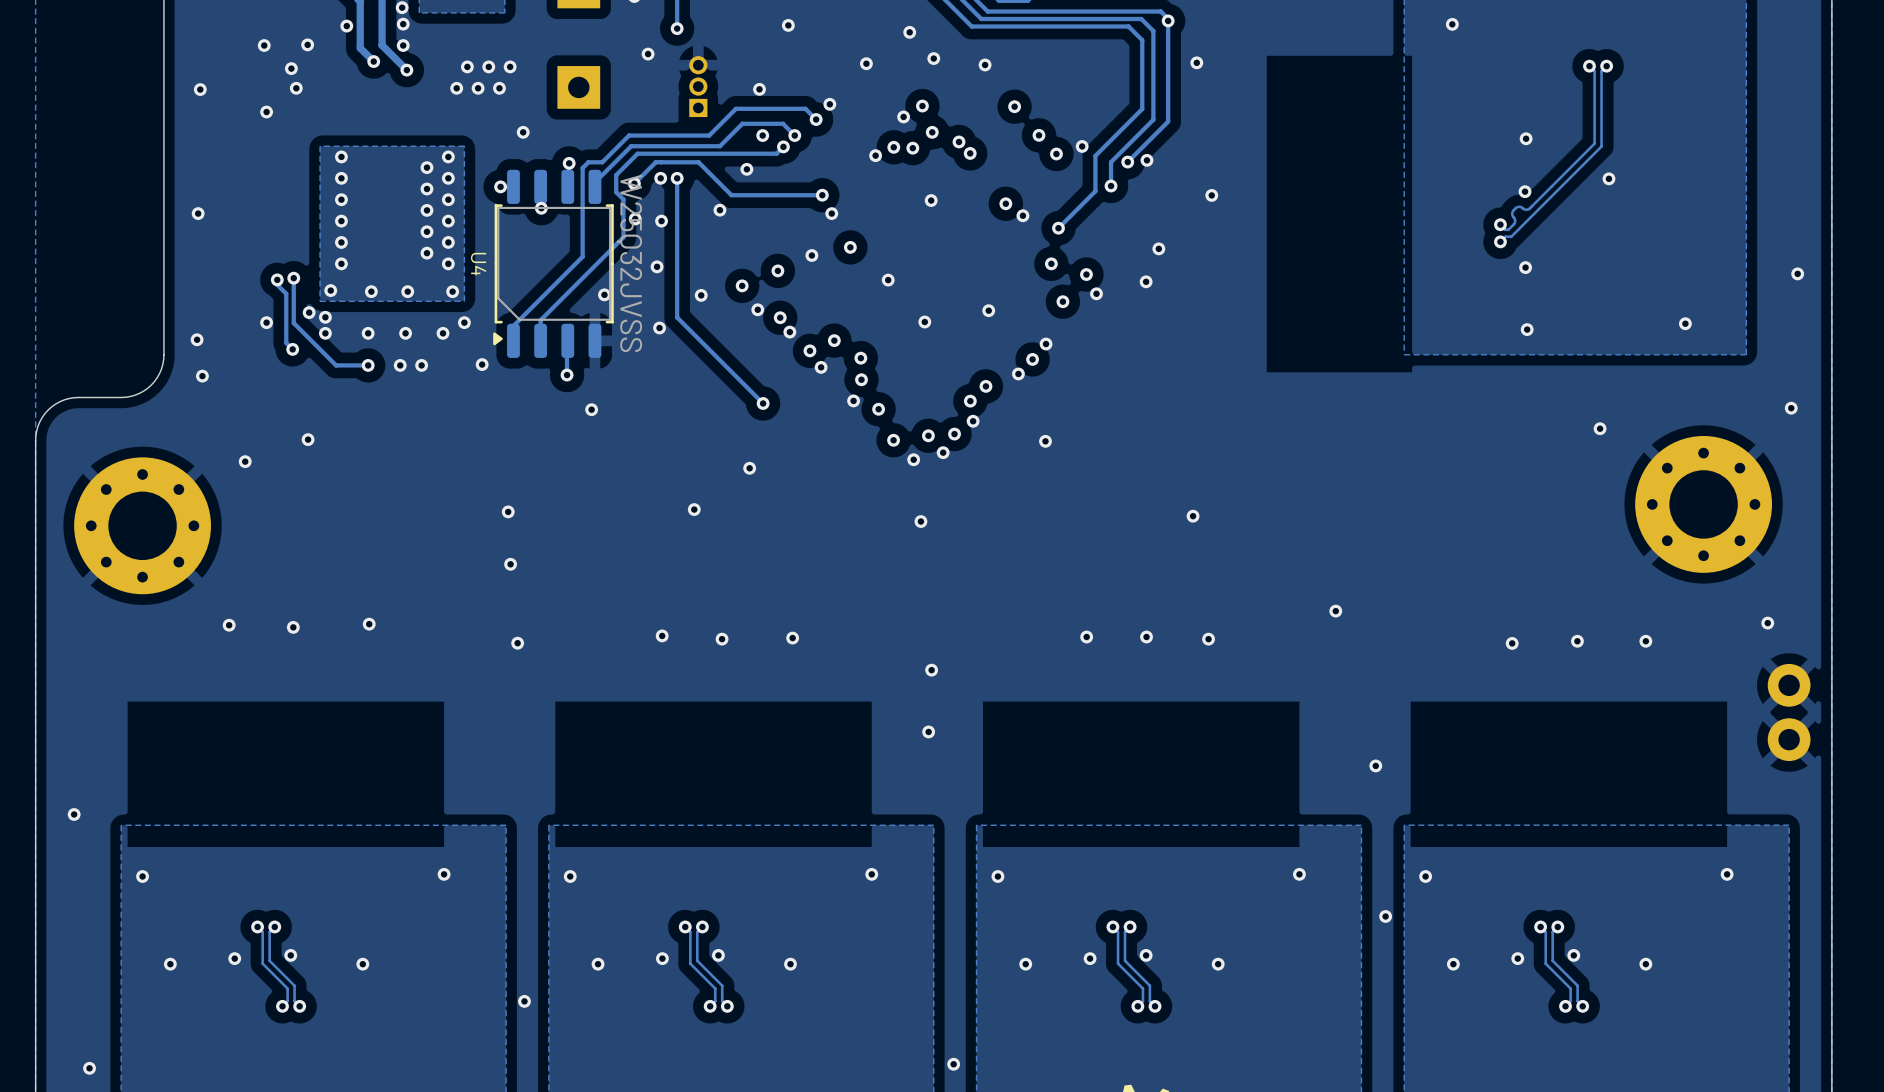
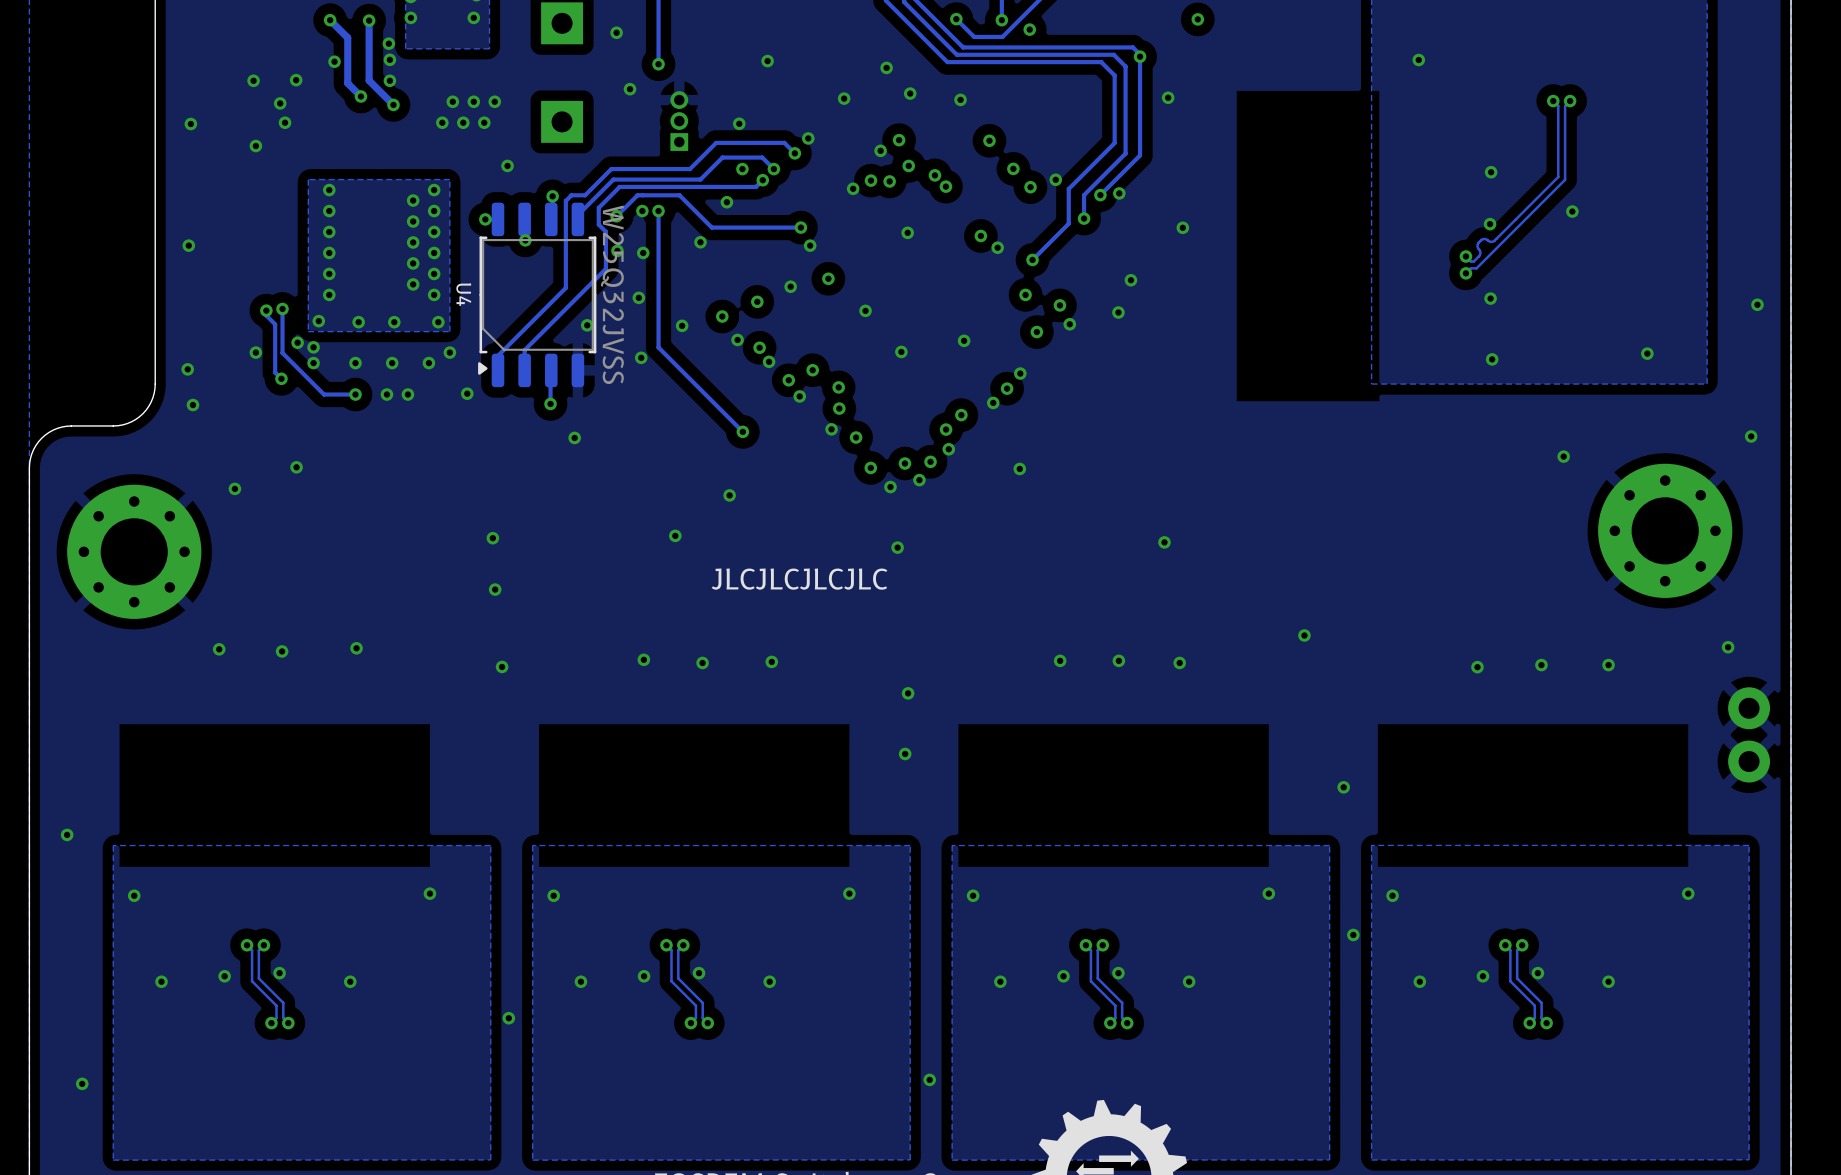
text: none -> JLCJLCJLCJLC (799, 579)

